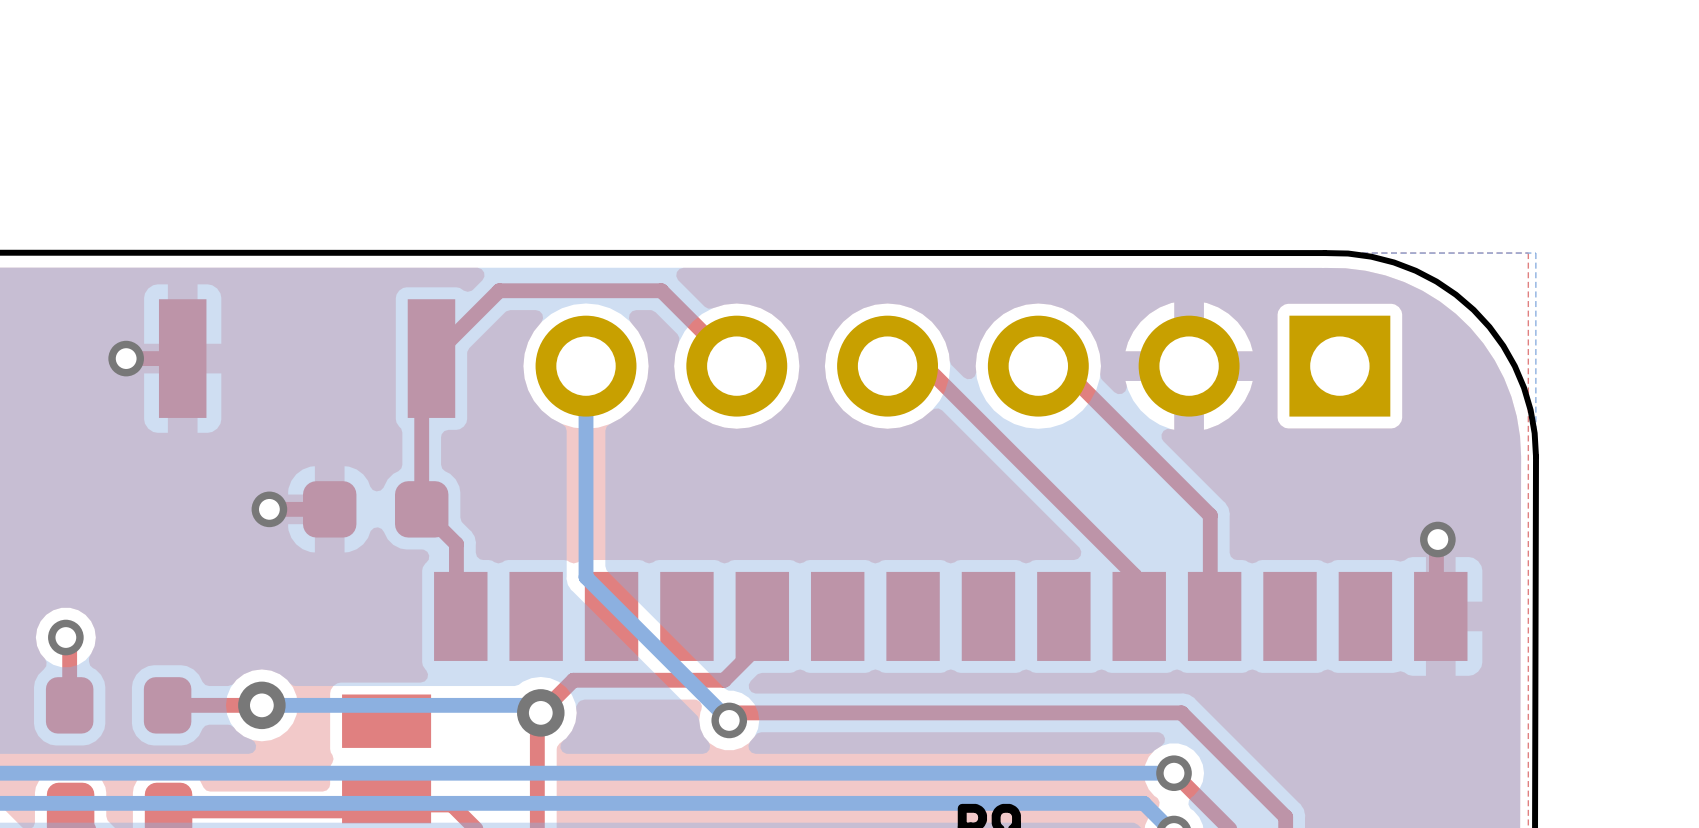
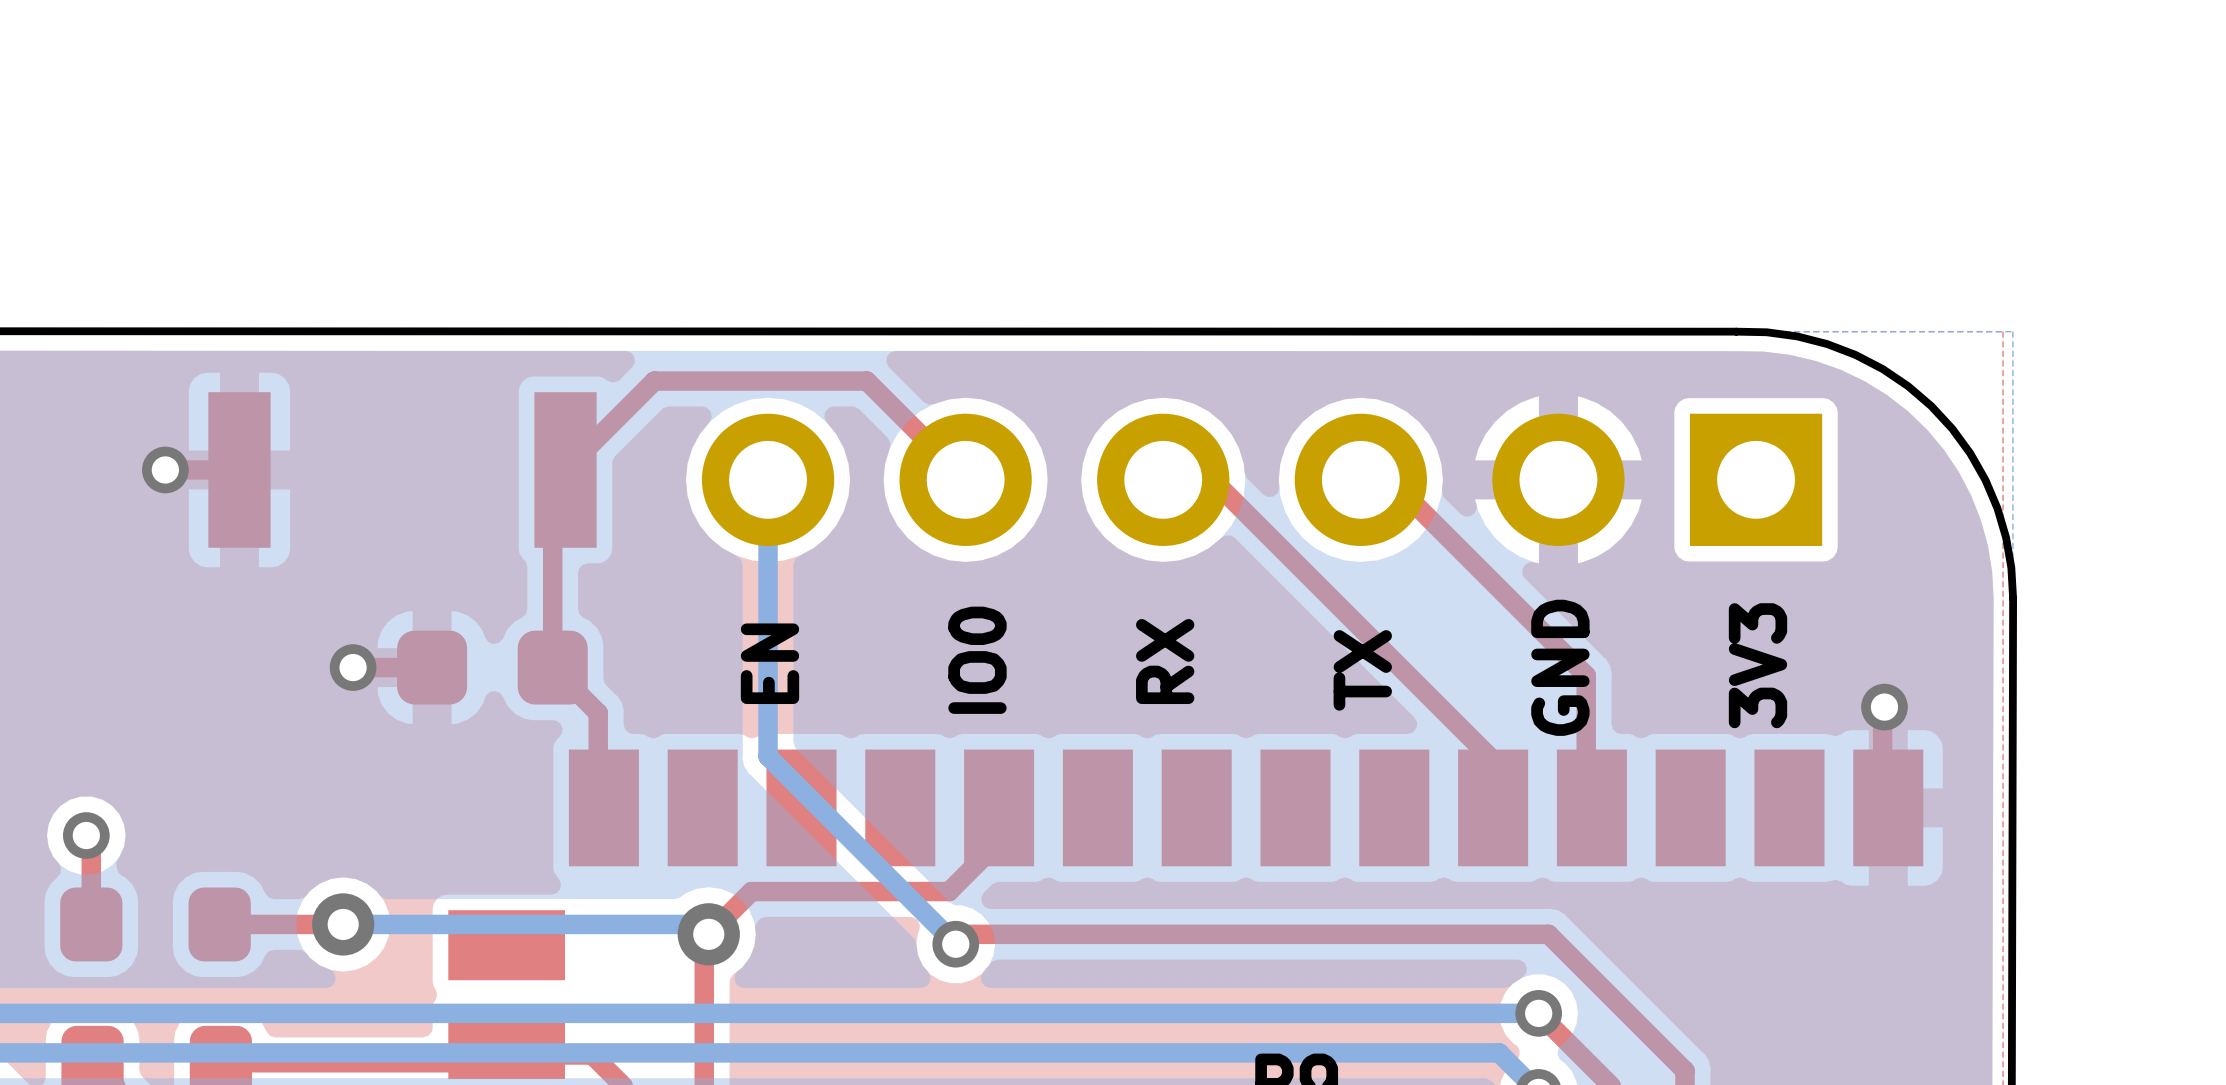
text: none -> IO0 (977, 660)
text: none -> RX (1165, 661)
text: none -> EN (769, 663)
text: none -> 3V3 (1757, 665)
text: none -> GND (1560, 667)
text: none -> TX (1362, 670)

